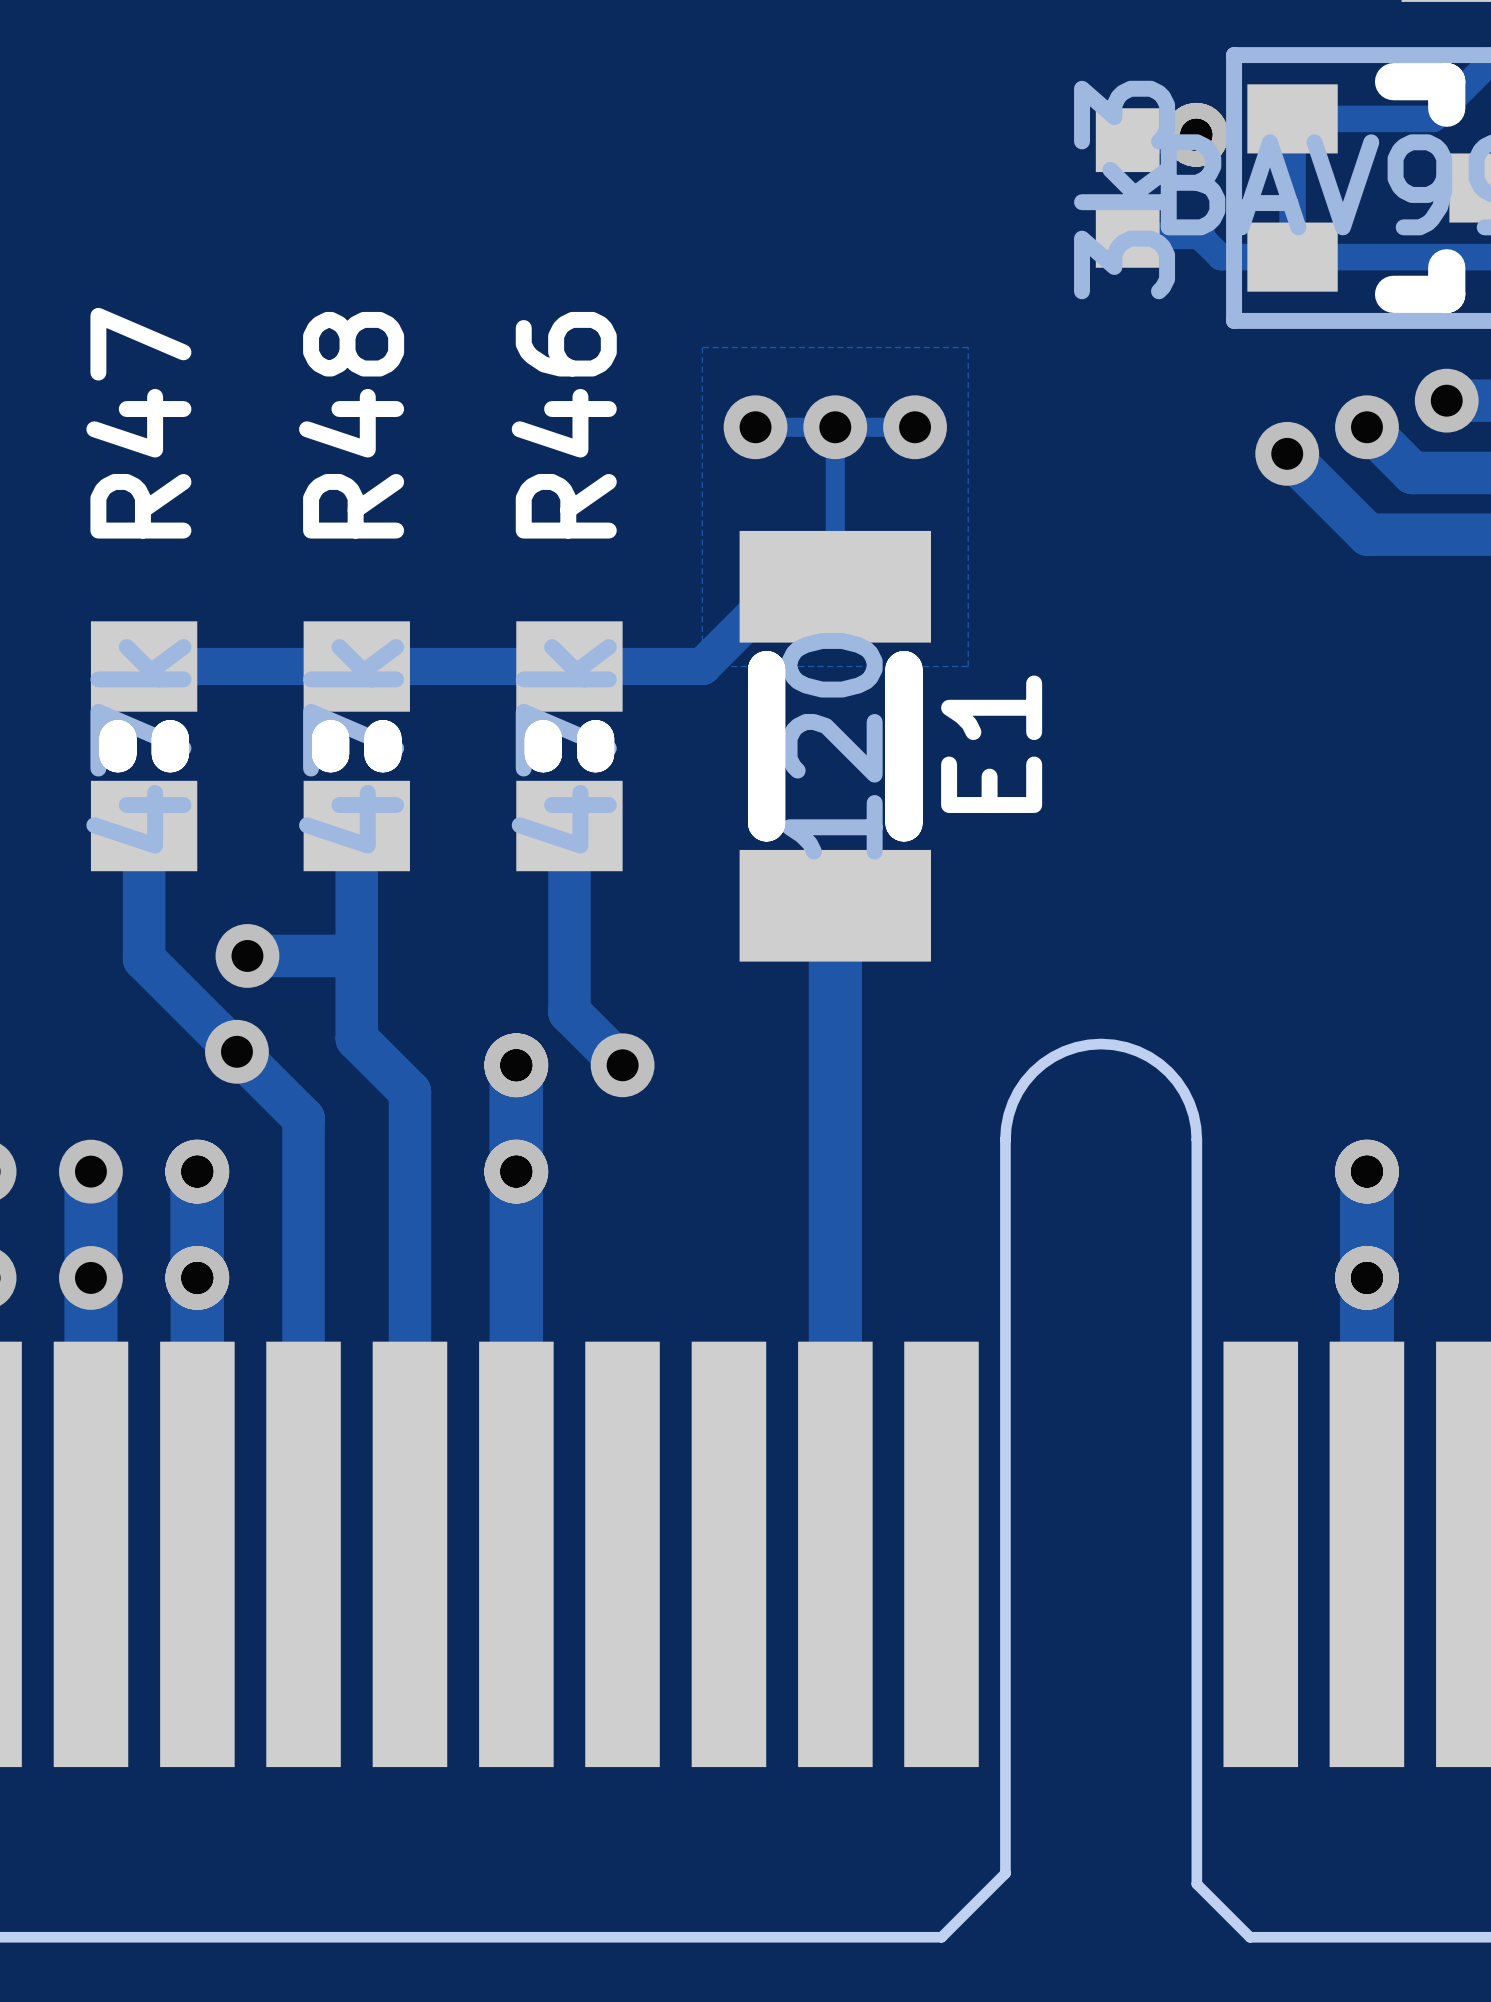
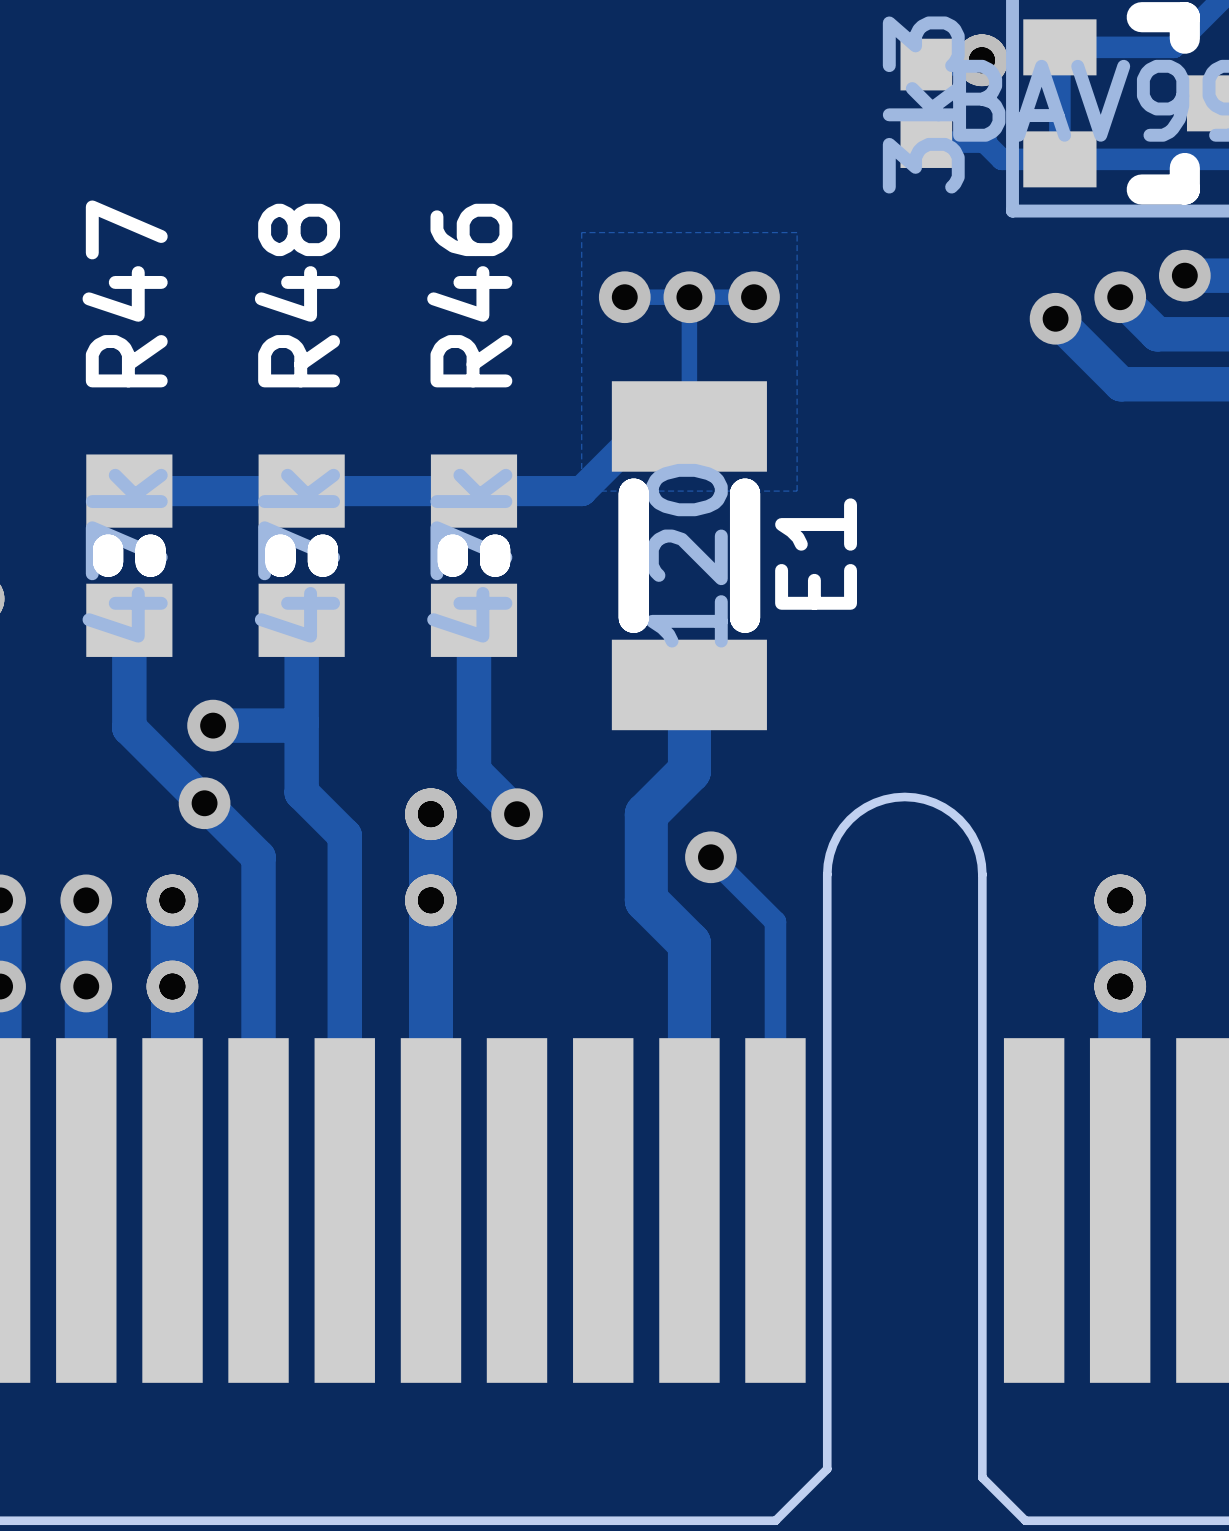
track: (835, 1012) (835, 1224) -> (689, 771) (646, 814) (646, 900) (689, 943)
track: none -> (710, 857) (775, 921) (775, 1210)
via: none -> (710, 857)

